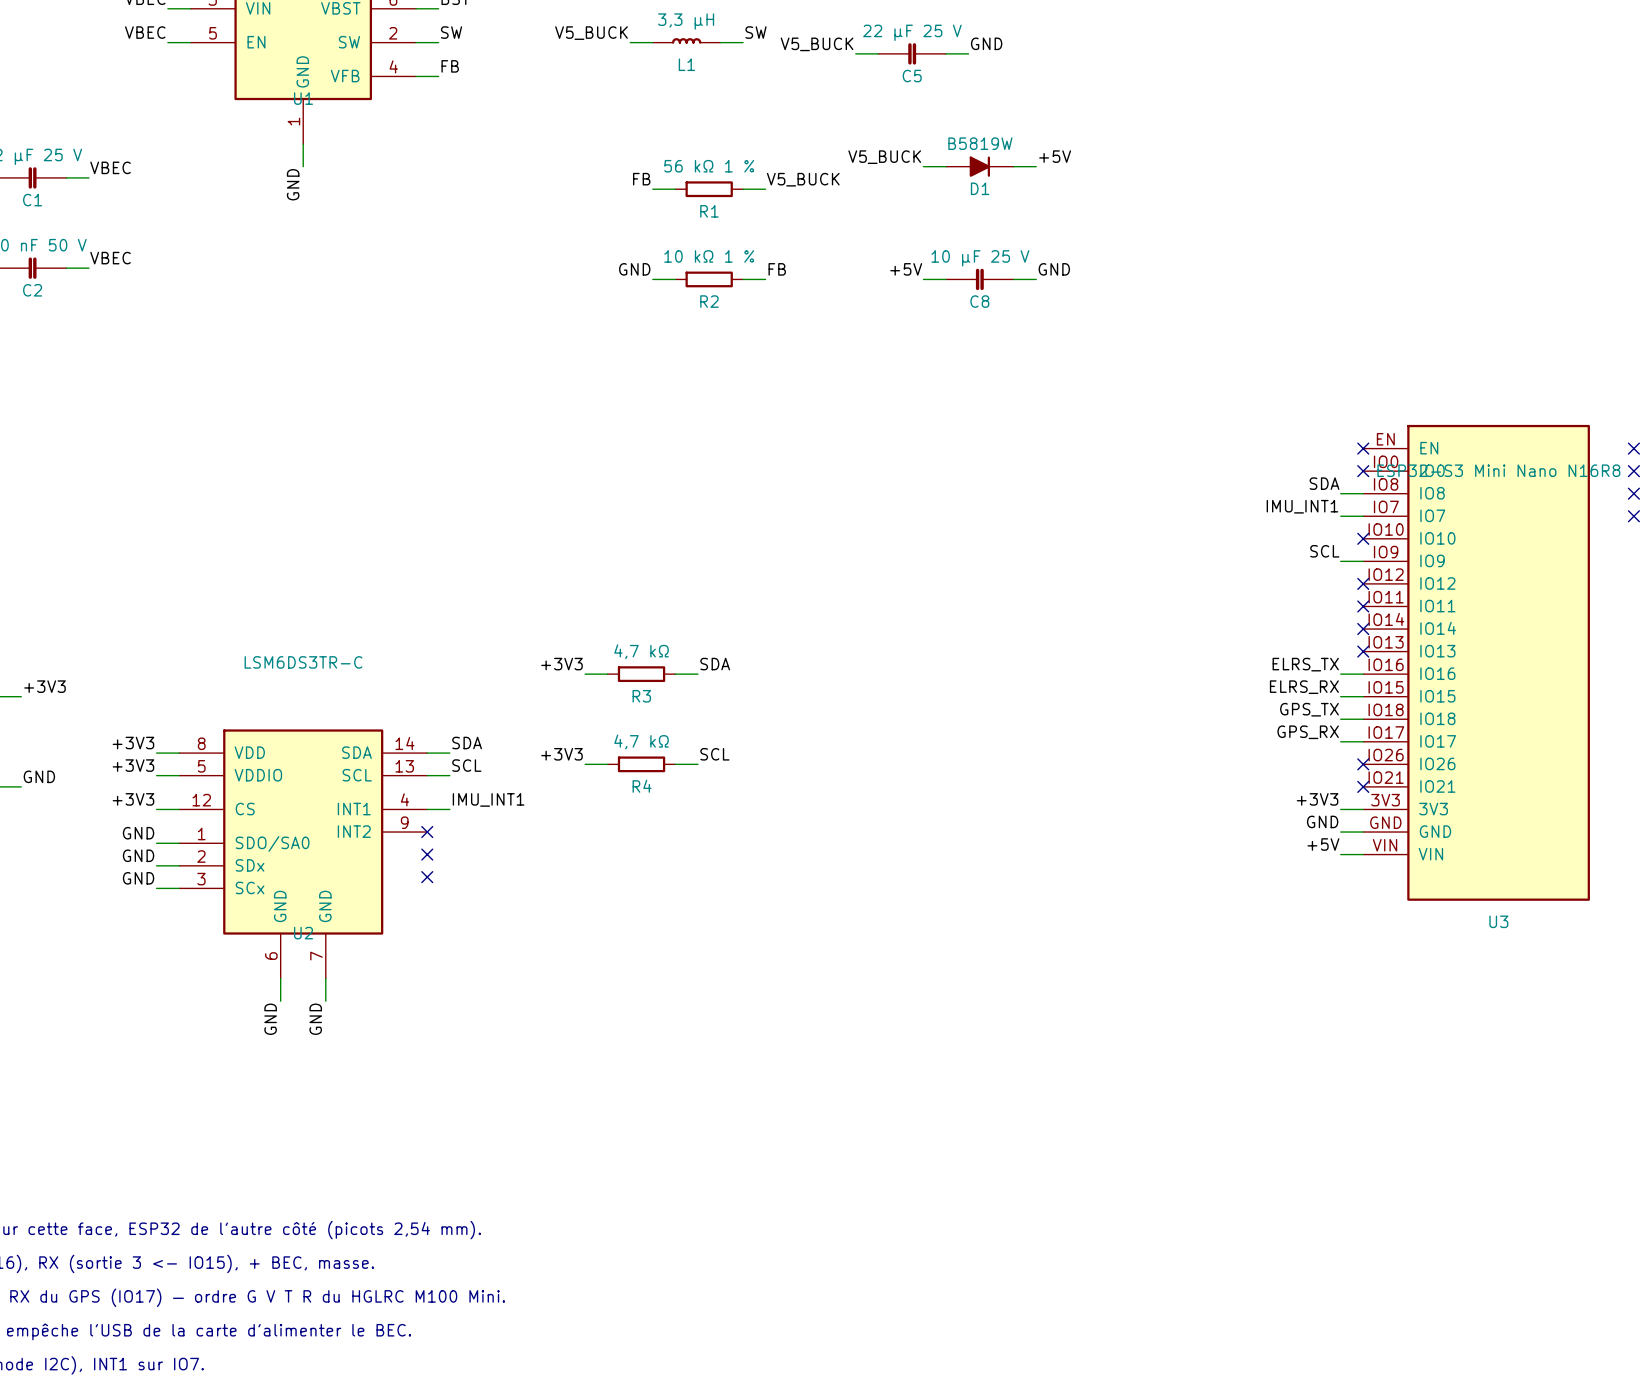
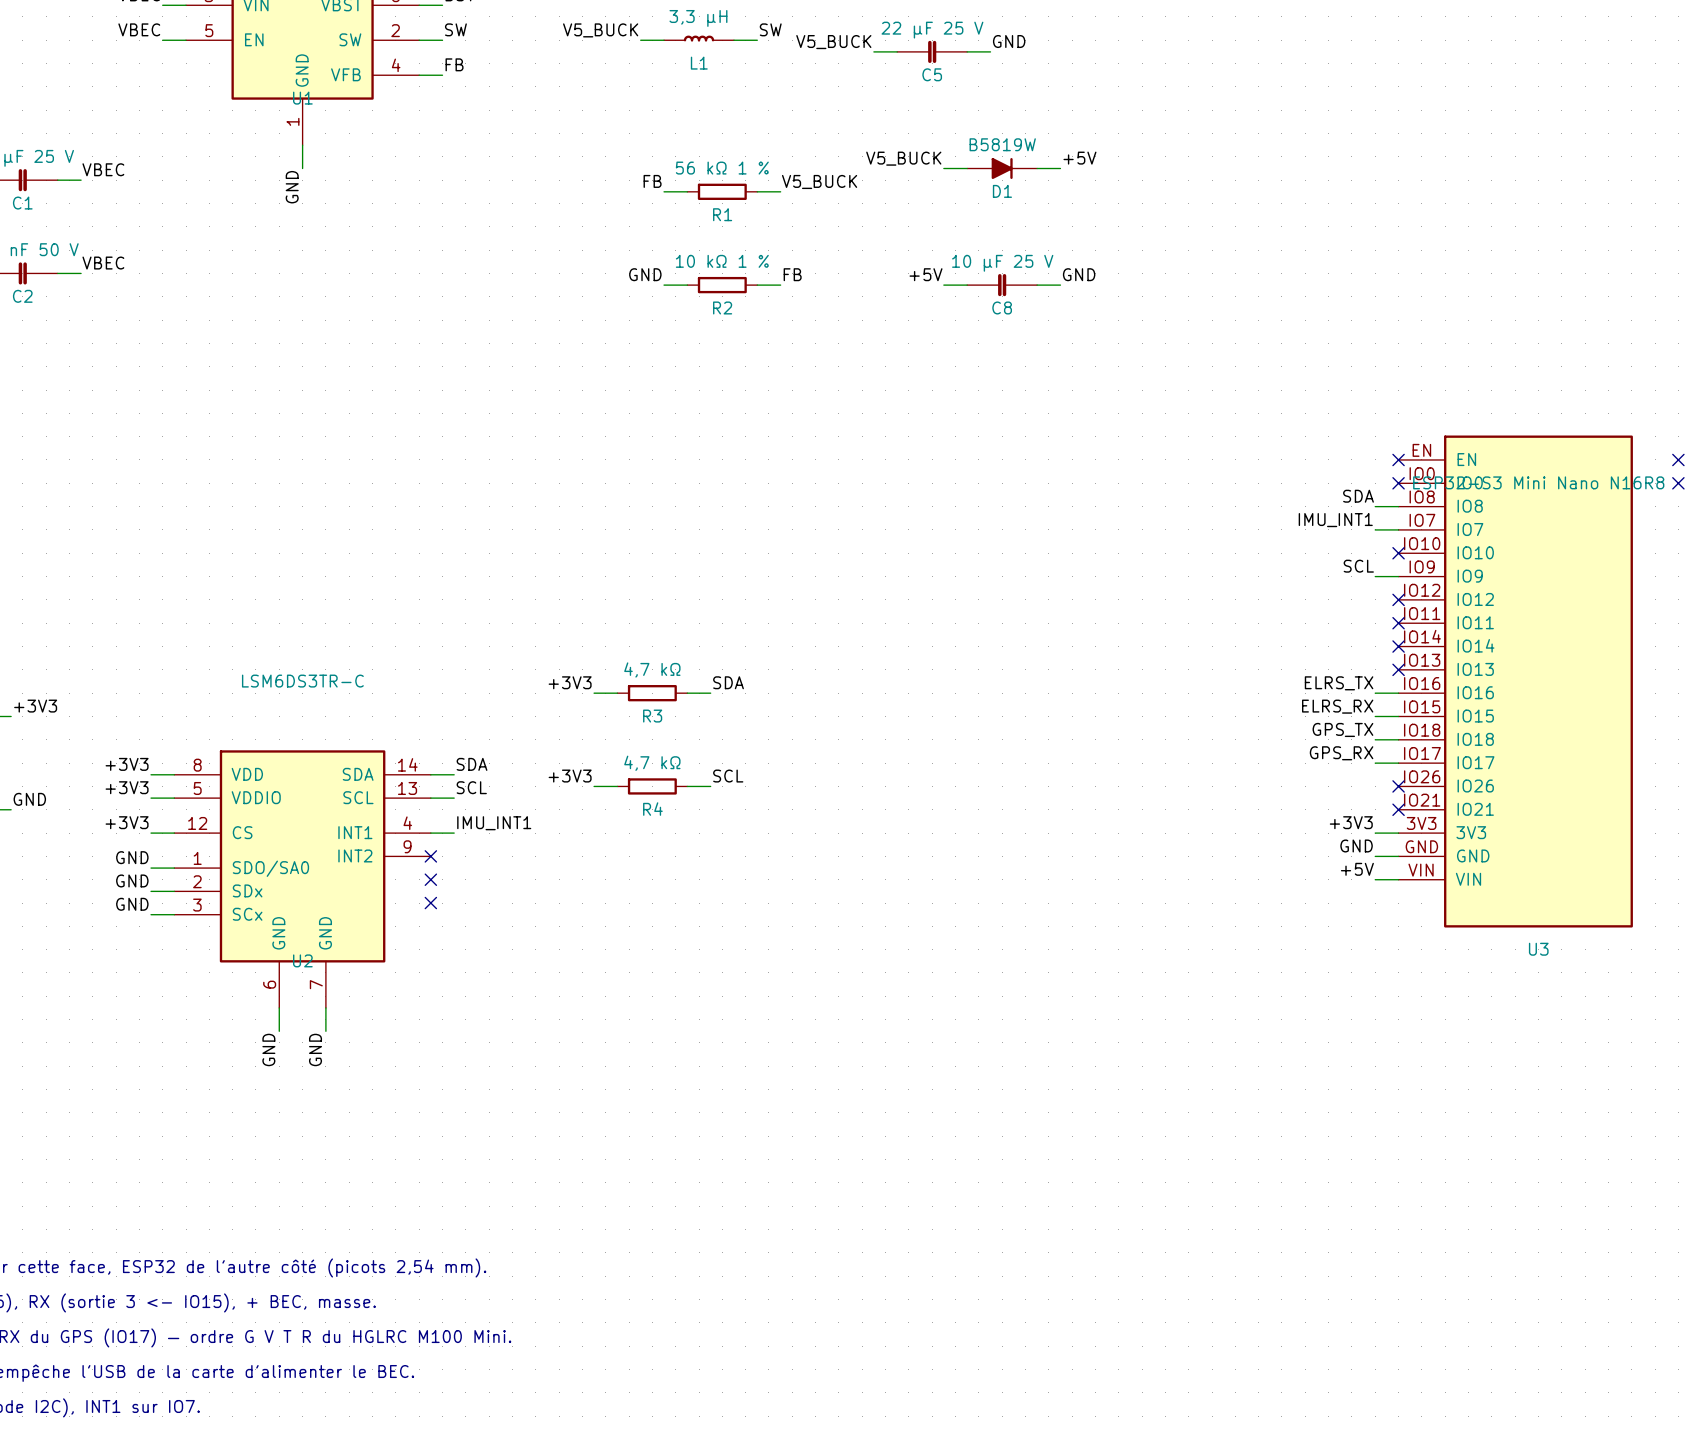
no-connect mark: (1633, 493) -> none
no-connect mark: (1633, 516) -> none

